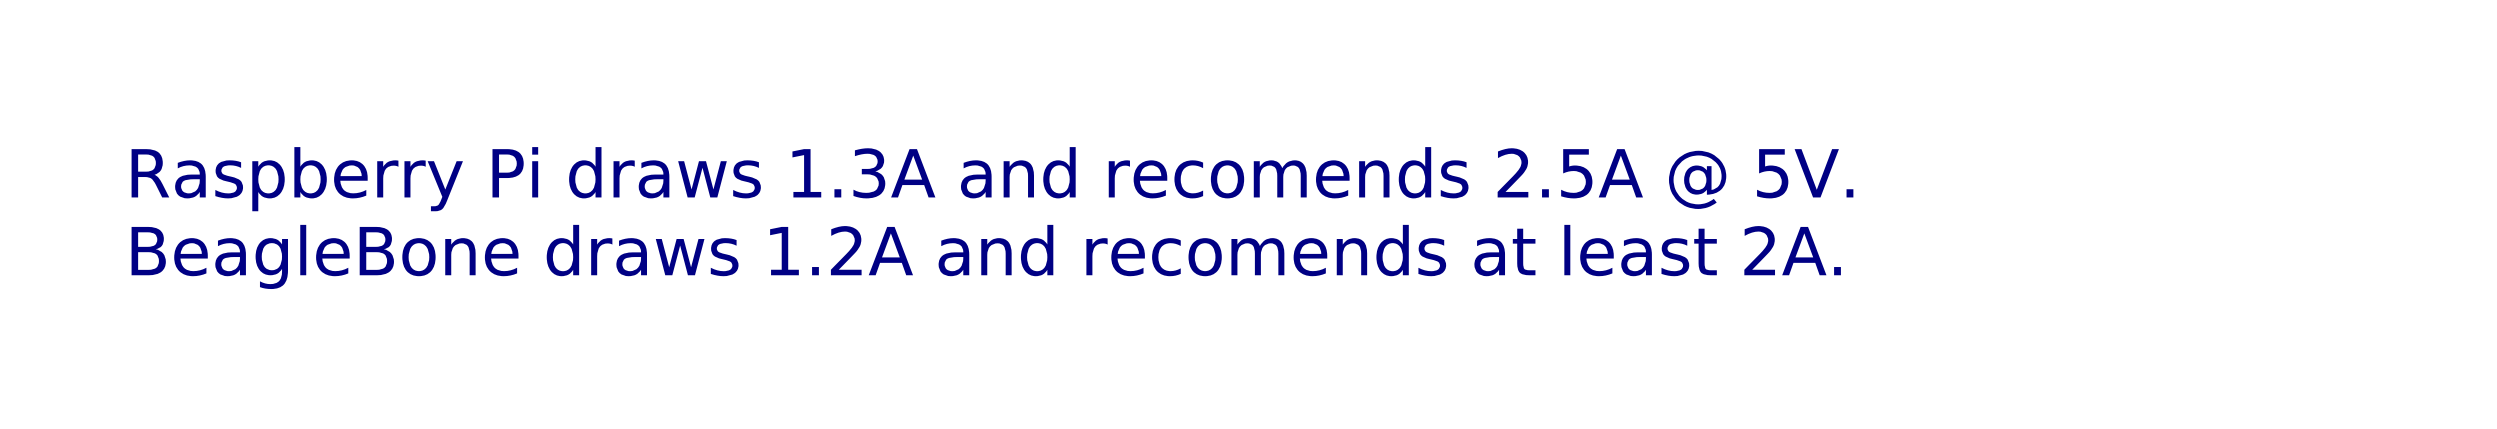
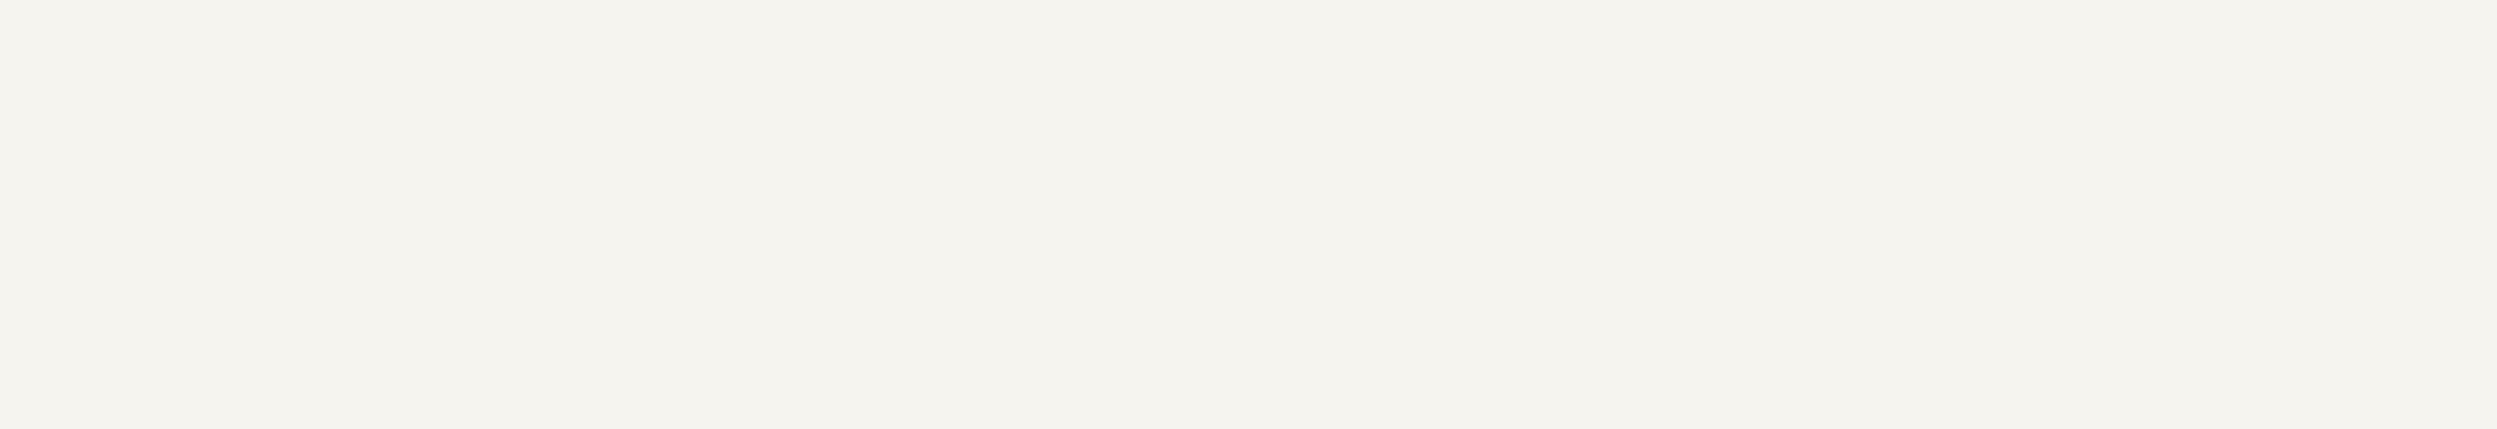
text: Raspberry Pi draws 1.3A and recomends 2.5A @ 5V. (992, 179) -> none
text: BeagleBone draws 1.2A and recomends at least 2A. (986, 256) -> none

